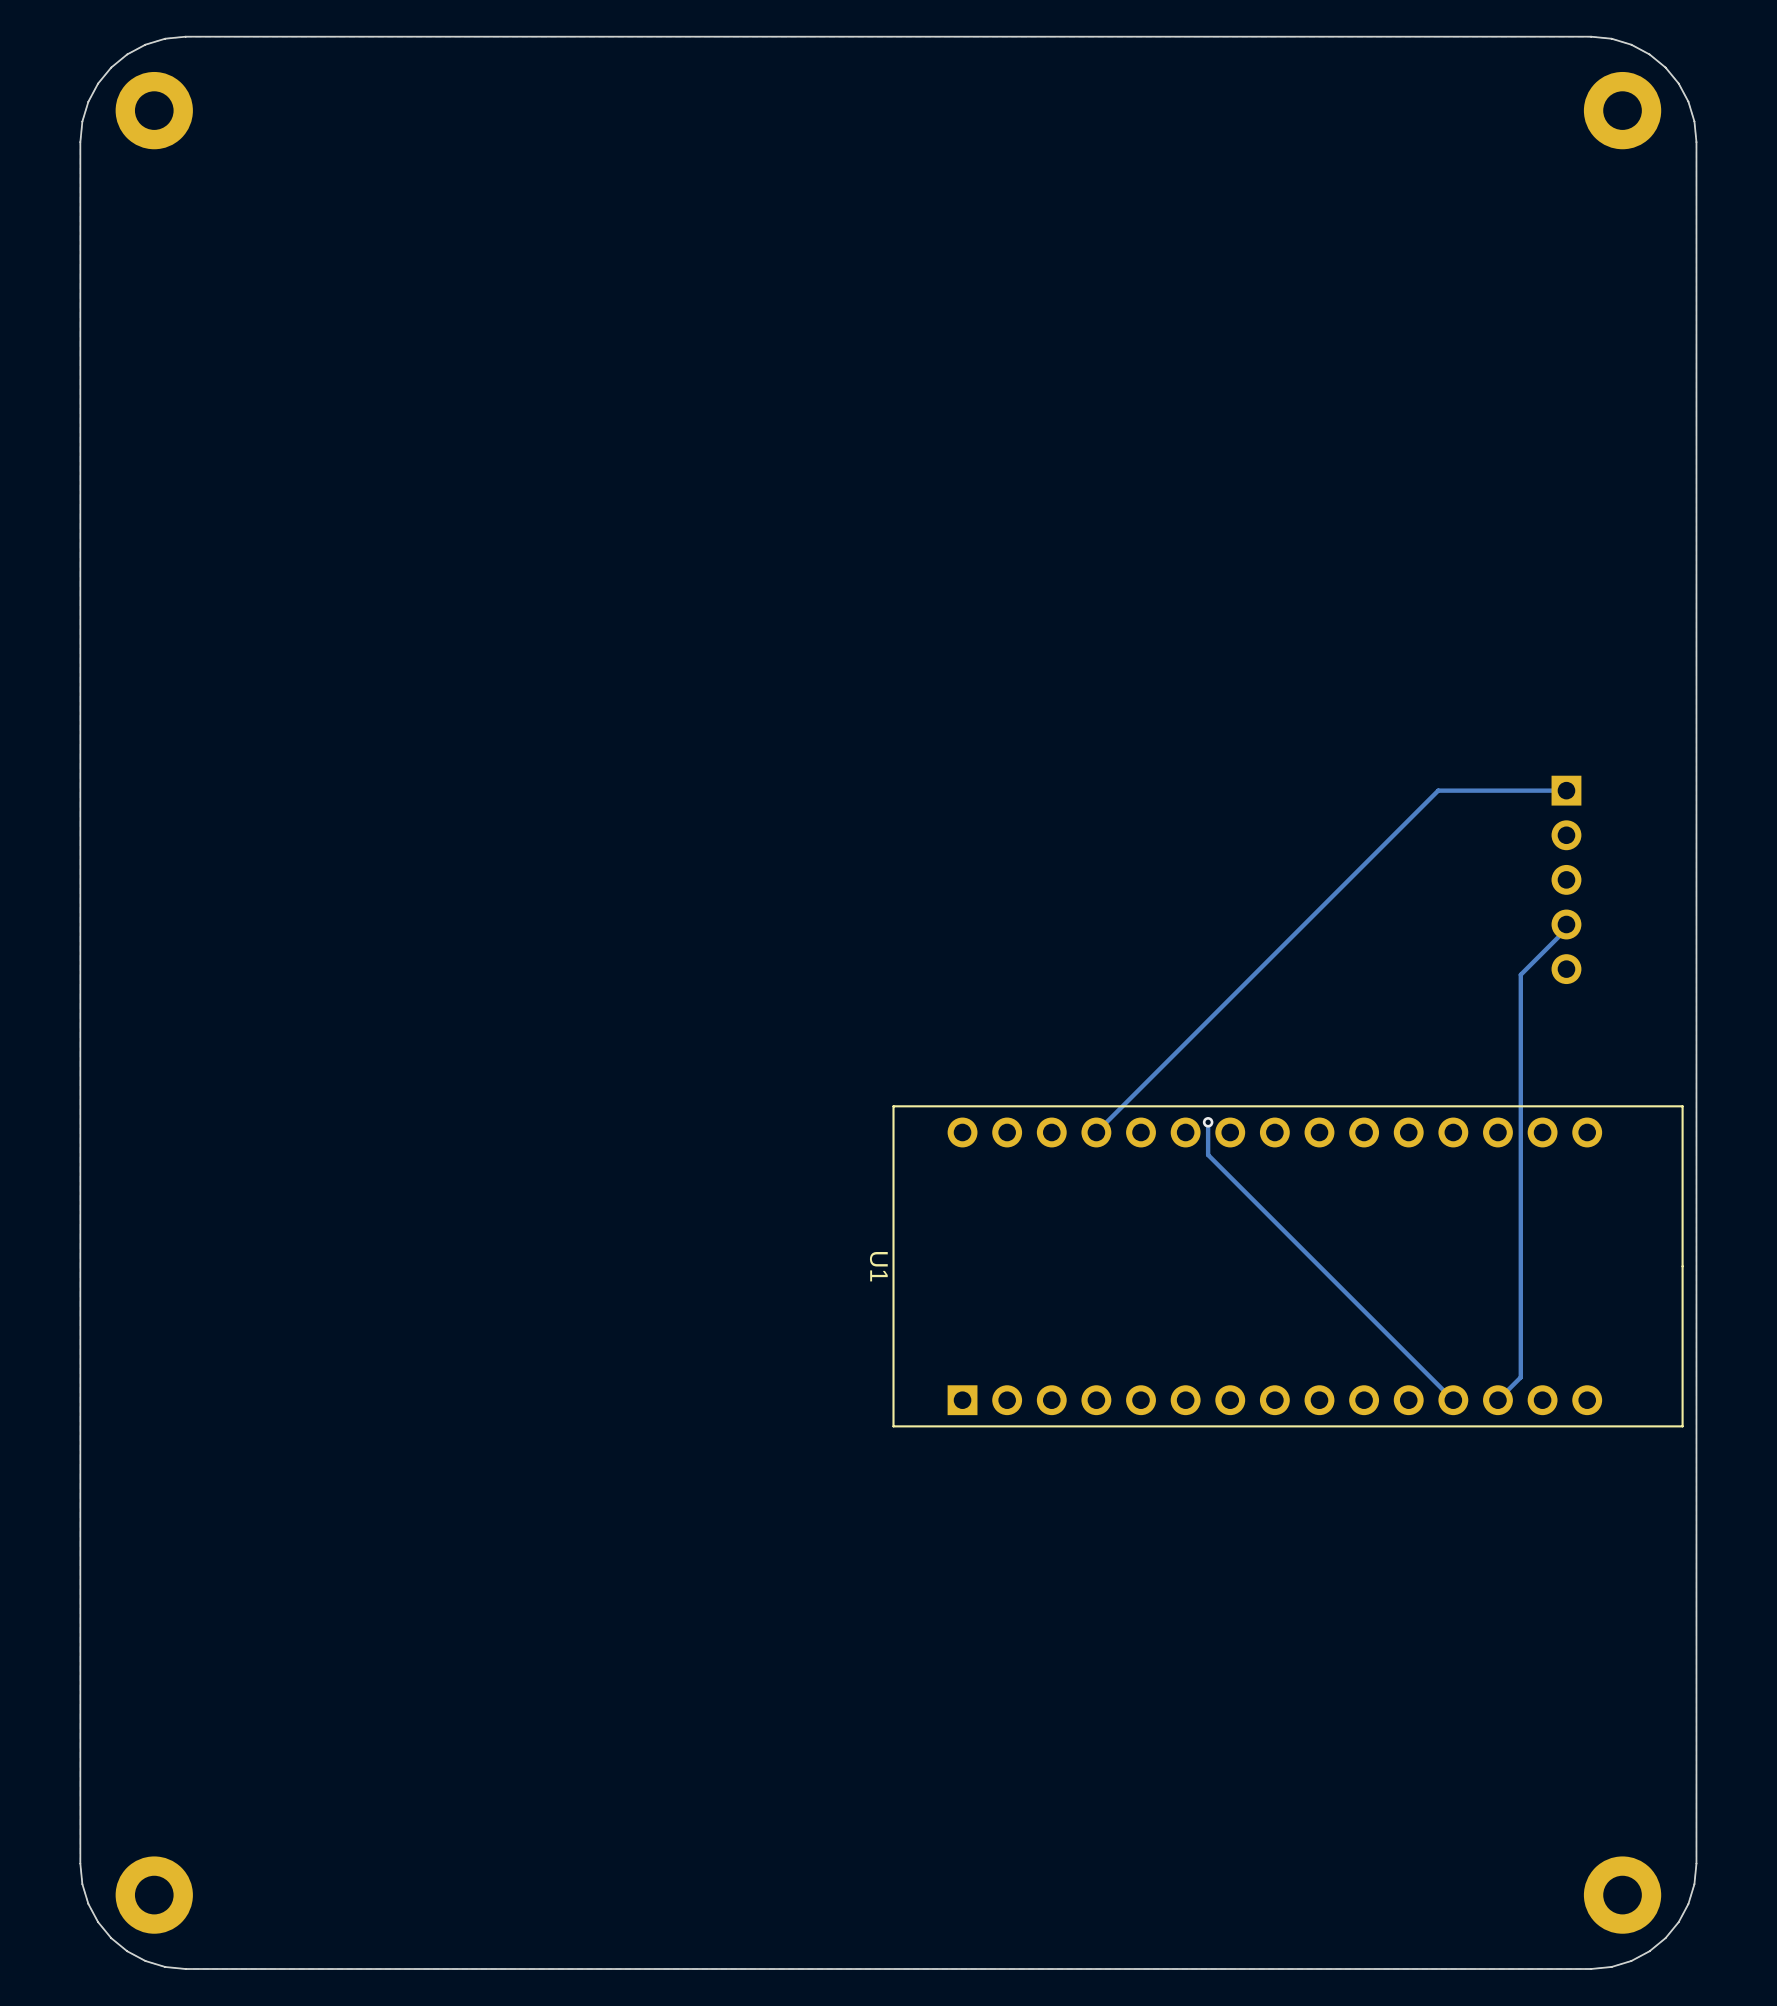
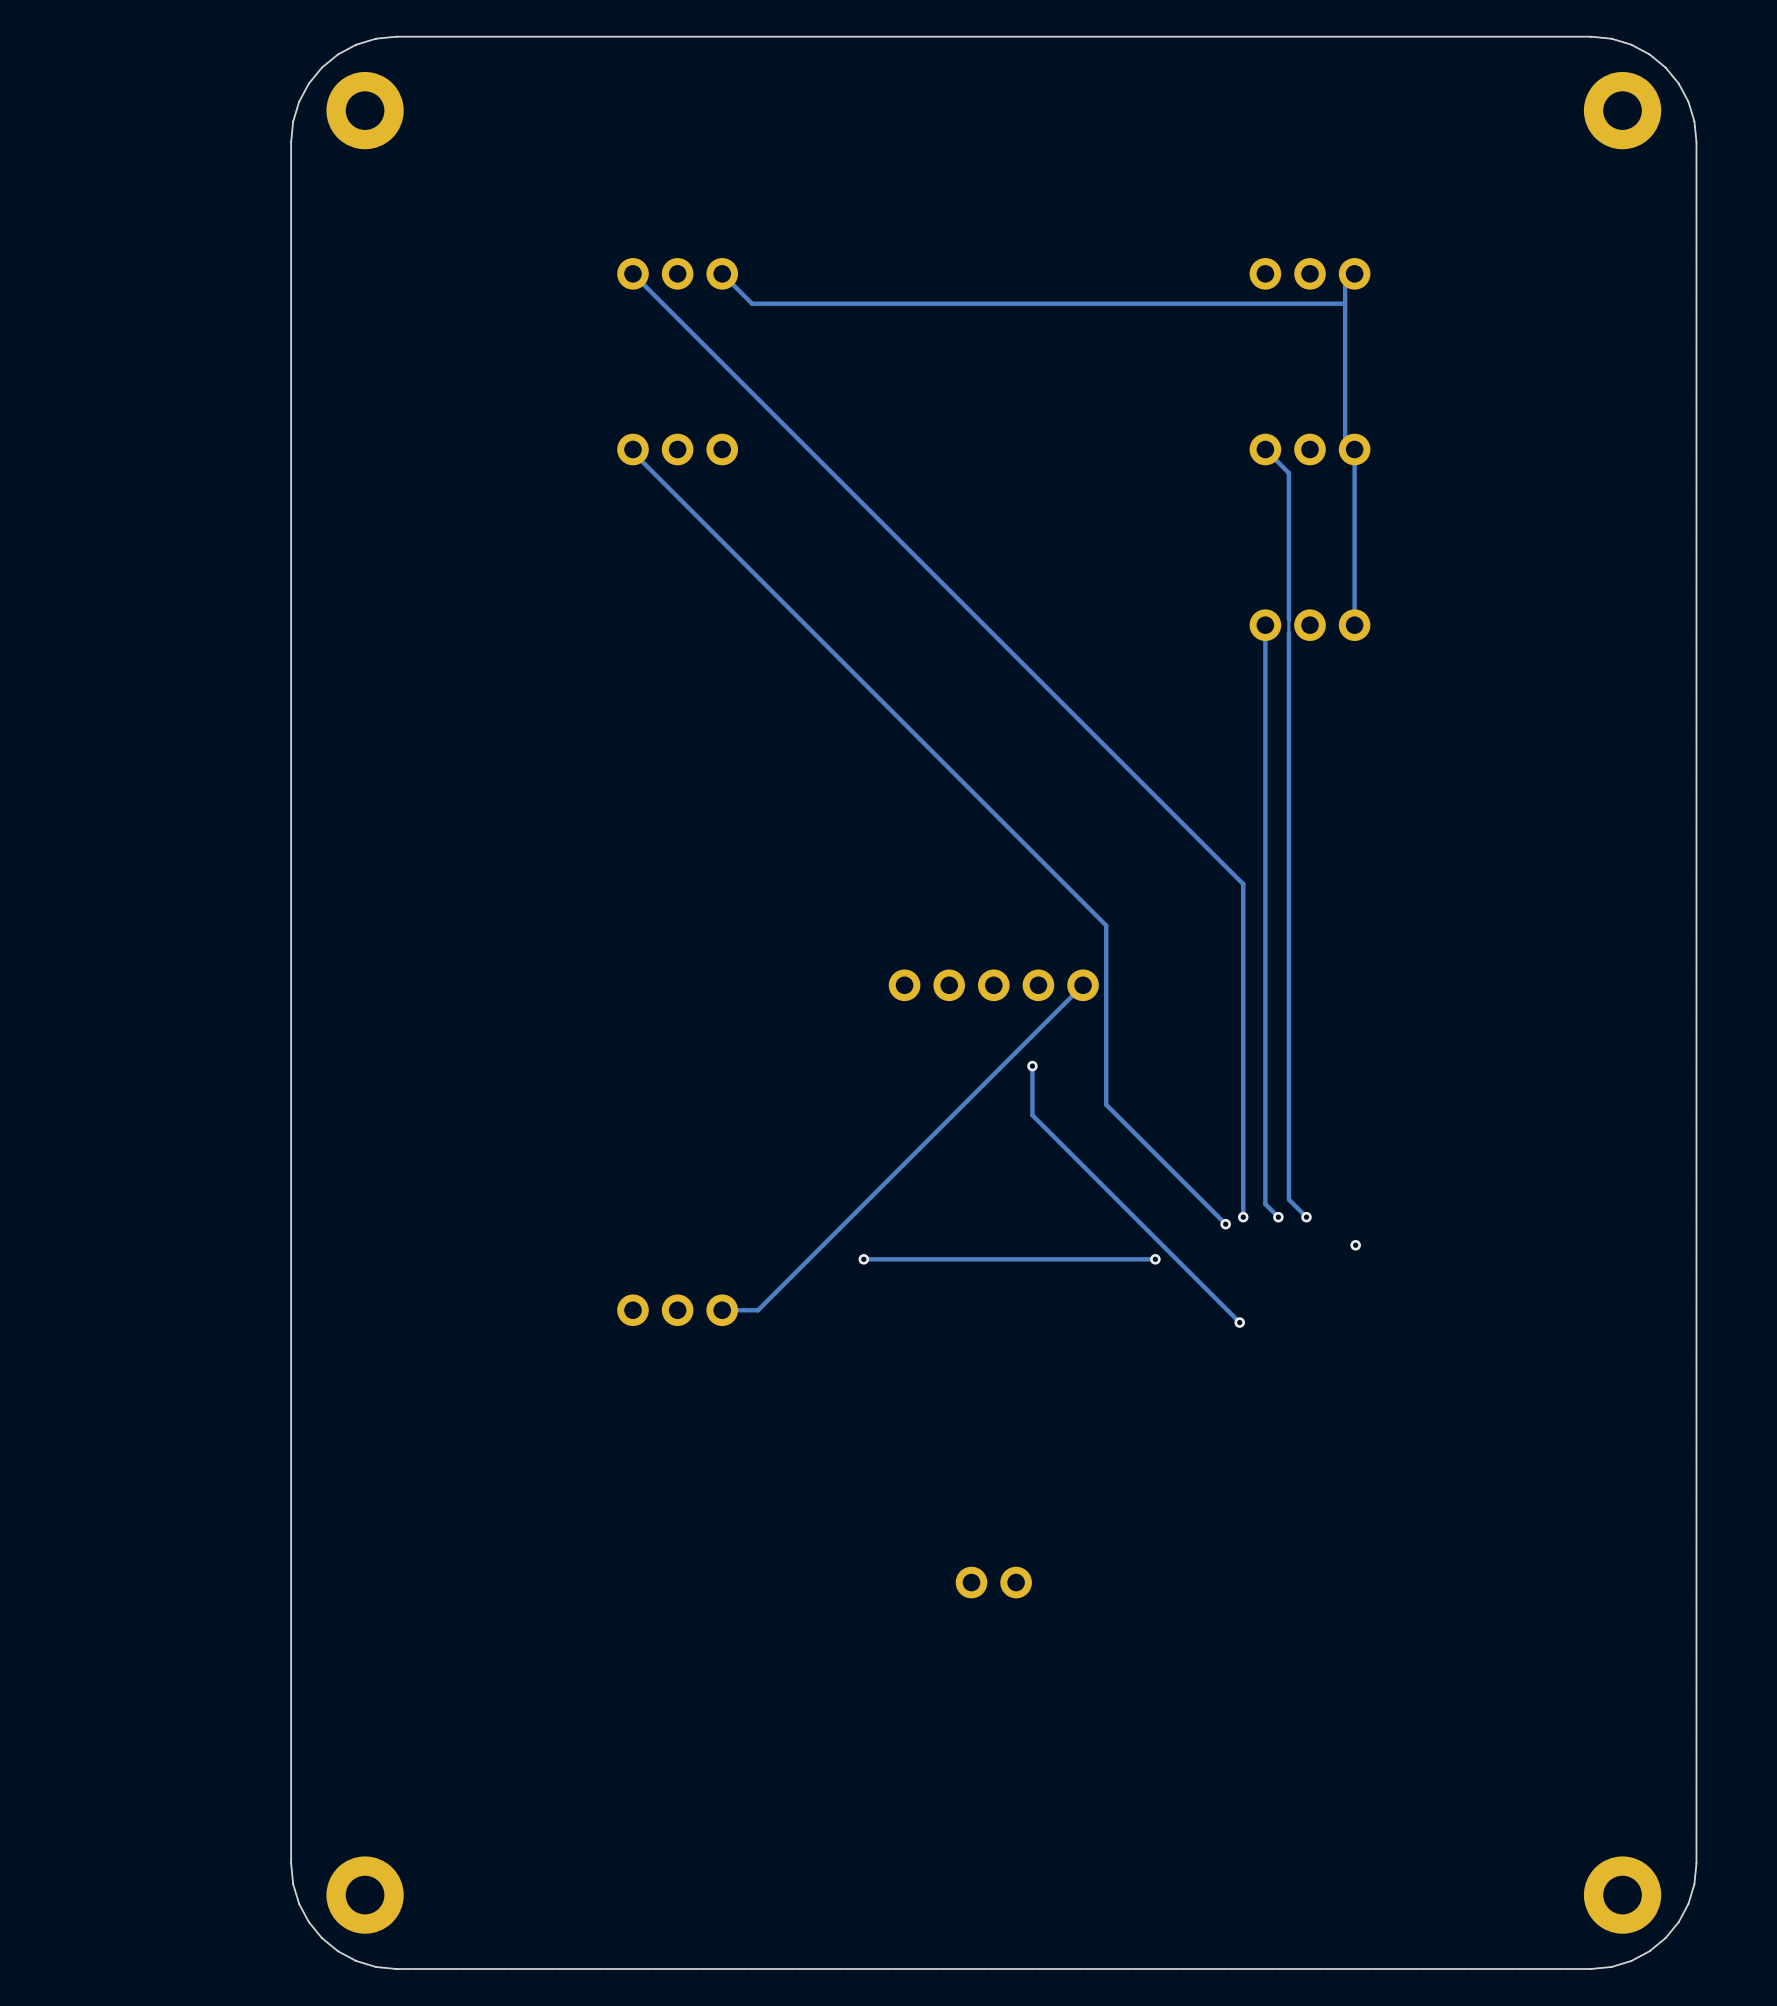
board edge: (396, 36) (185, 36) (165, 38) (145, 44) (127, 54) (111, 67) (98, 83) (88, 101) (82, 121) (80, 142) (80, 1863) (82, 1884) (88, 1903) (98, 1922) (111, 1938) (127, 1951) (145, 1960) (165, 1966) (185, 1969) (396, 1969) -> (396, 36) (375, 38) (356, 44) (337, 54) (322, 67) (308, 83) (299, 101) (293, 121) (291, 142) (291, 1863) (293, 1884) (299, 1903) (308, 1922) (322, 1938) (337, 1951) (356, 1960) (375, 1966) (396, 1969)
part position: (154, 110) -> (365, 110)
track: none -> (632, 273) (1243, 884) (1243, 1217)
part: none -> (677, 273)
track: none -> (722, 273) (752, 303) (1345, 303)
part: none -> (1310, 273)
track: none -> (1345, 286) (1345, 437)
track: none -> (632, 449) (632, 452) (1106, 925) (1106, 1104) (1225, 1224)
part: none -> (677, 449)
track: none -> (1265, 449) (1288, 473) (1288, 1199) (1306, 1217)
part: none -> (1310, 449)
track: none -> (1354, 449) (1354, 625)
track: none -> (1265, 625) (1265, 1204) (1278, 1217)
part: none -> (1310, 625)
track: (1566, 790) (1438, 790) (1096, 1132) -> none
part: (1566, 879) -> none
track: (1566, 924) (1566, 929) (1520, 974) (1520, 1377) (1497, 1400) -> none
part: none -> (993, 985)
track: none -> (1083, 985) (758, 1310) (722, 1310)
track: none -> (1032, 1066) (1032, 1115) (1239, 1322)
via: none -> (1032, 1066)
track: (1208, 1122) (1208, 1154) (1453, 1400) -> none
via: (1208, 1122) -> none
via: none -> (1243, 1217)
via: none -> (1278, 1217)
via: none -> (1306, 1217)
via: none -> (1225, 1224)
via: none -> (1355, 1245)
via: none -> (863, 1259)
track: none -> (1155, 1259) (863, 1259)
via: none -> (1155, 1259)
U1: (1288, 1266) -> none
part: none -> (677, 1310)
via: none -> (1239, 1322)
part: none -> (993, 1582)
part position: (154, 1895) -> (365, 1895)

